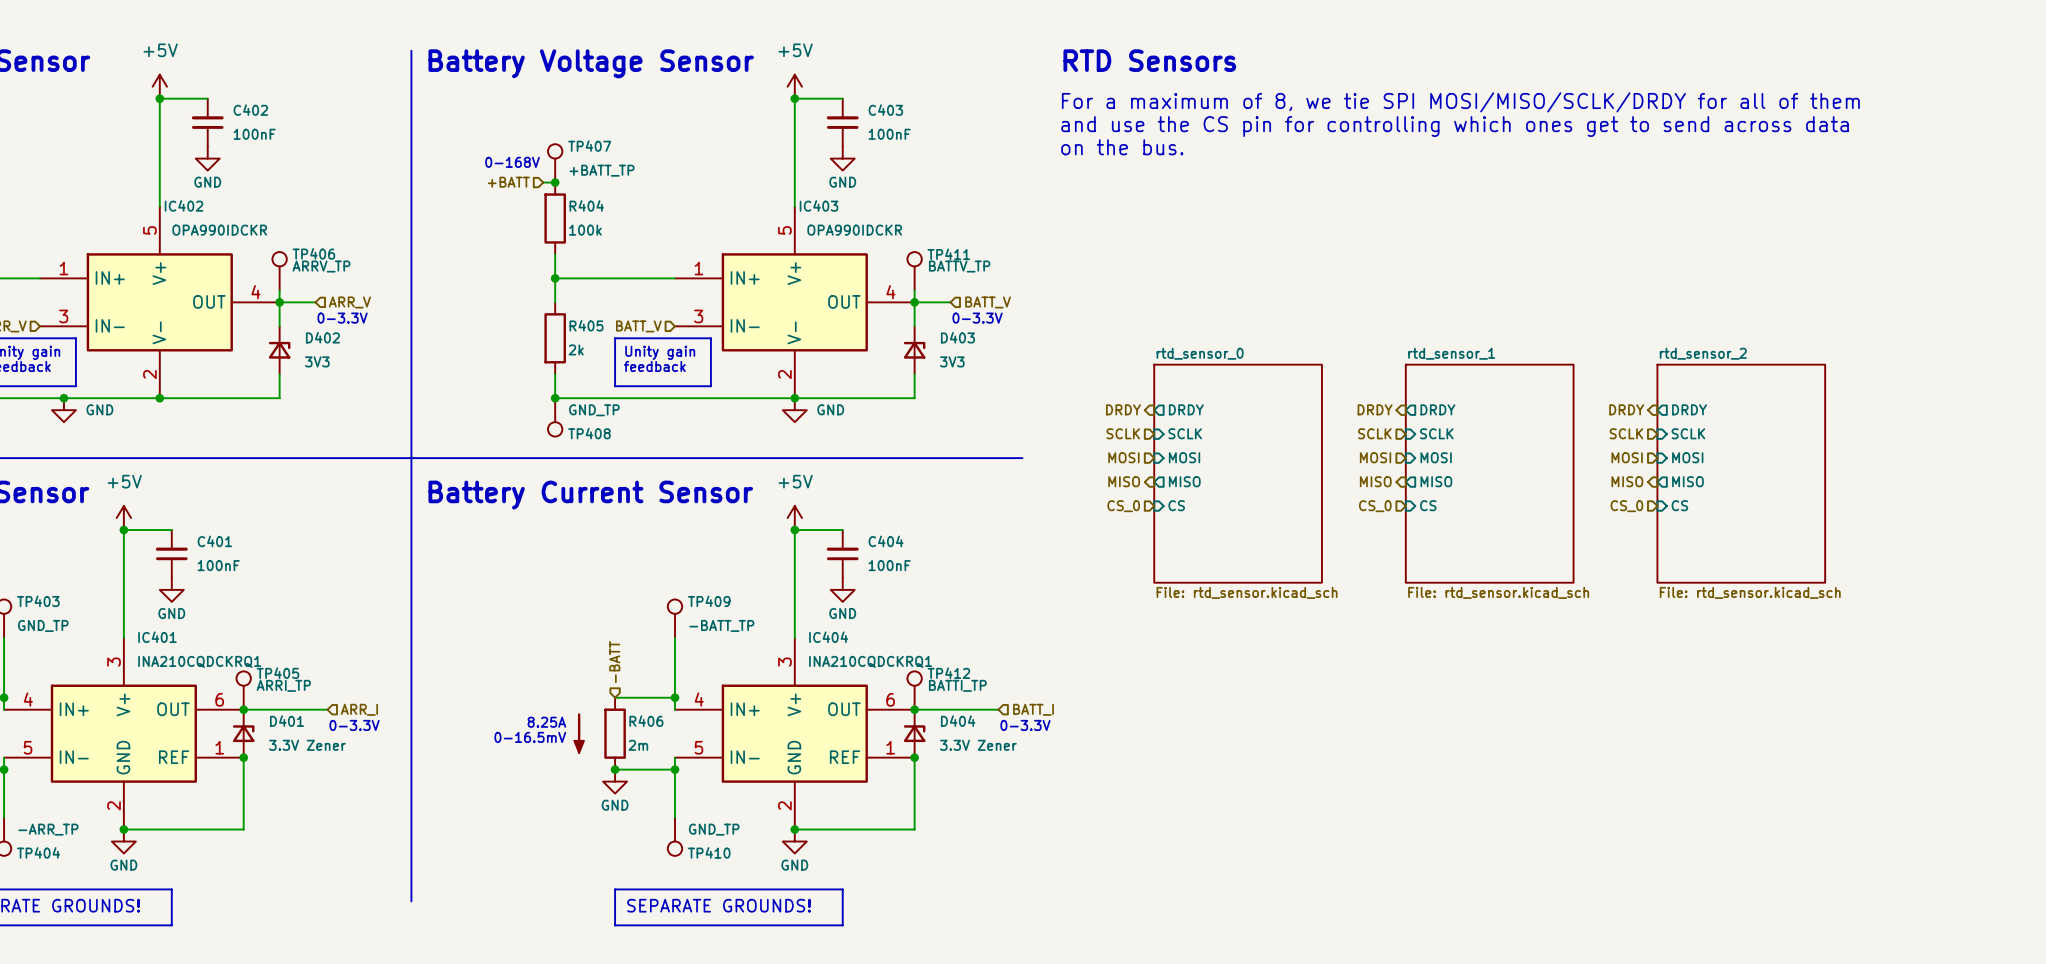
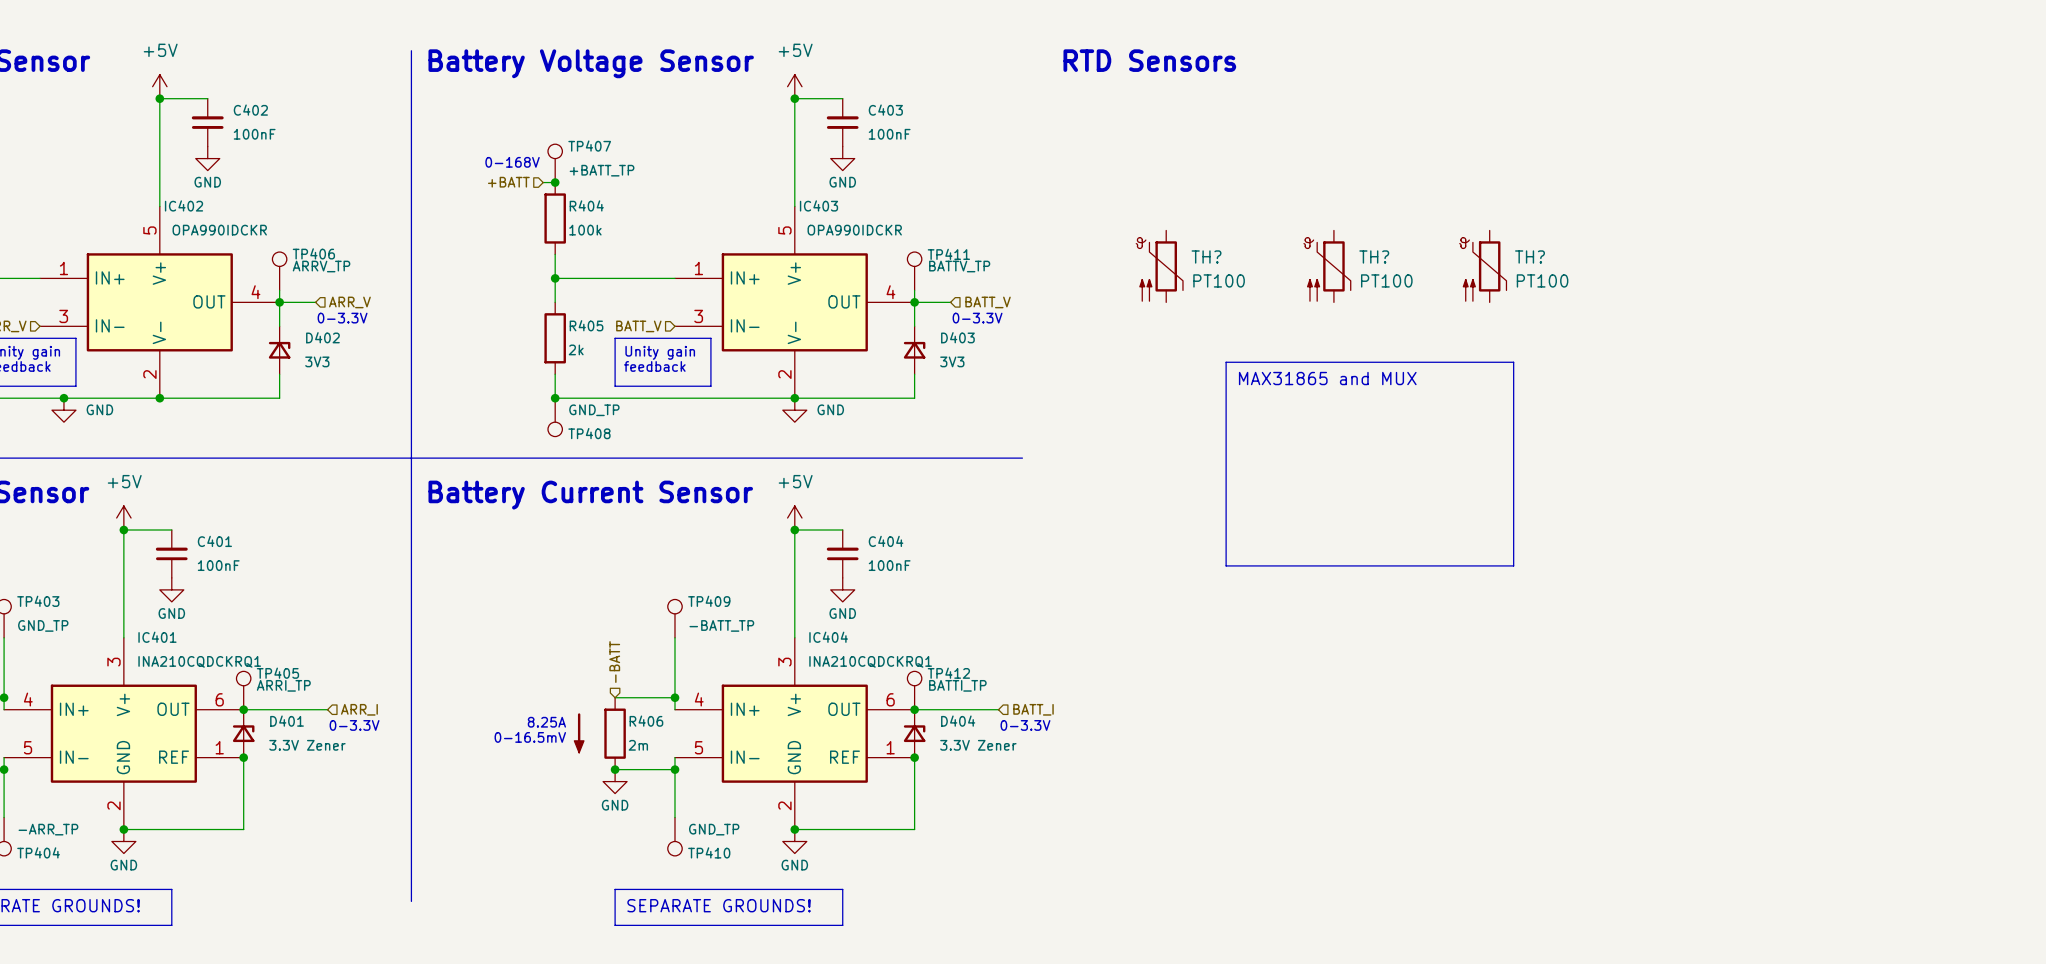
text: For a maximum of 8, we tie SPI MOSI/MISO/SCLK/DRDY for all of them (1460, 102) -> none
text: and use the CS pin for controlling which ones get to send across data (1455, 126) -> none
text: on the bus. (1122, 147) -> none
TH?: none -> PT100 (1159, 266)
TH?: none -> PT100 (1327, 266)
TH?: none -> PT100 (1483, 266)
line: none -> (1226, 362) (1513, 362) (1513, 565) (1226, 565) (1226, 362)
text: none -> MAX31865 and MUX (1327, 378)
hierarchical label: DRDY (1123, 409) -> none
sheet pin: DRDY (1186, 409) -> none
hierarchical label: DRDY (1375, 409) -> none
sheet pin: DRDY (1437, 409) -> none
hierarchical label: DRDY (1626, 409) -> none
sheet pin: DRDY (1689, 409) -> none
hierarchical label: SCLK (1123, 433) -> none
sheet pin: SCLK (1185, 433) -> none
hierarchical label: SCLK (1374, 433) -> none
sheet pin: SCLK (1436, 433) -> none
hierarchical label: SCLK (1626, 433) -> none
sheet pin: SCLK (1688, 433) -> none
hierarchical label: MOSI (1123, 457) -> none
sheet pin: MOSI (1184, 457) -> none
hierarchical label: MOSI (1375, 457) -> none
sheet pin: MOSI (1436, 457) -> none
hierarchical label: MOSI (1627, 457) -> none
sheet pin: MOSI (1687, 457) -> none
sheet rtd_sensor_0: File: rtd_sensor.kicad_sch (1238, 473) -> none
sheet rtd_sensor_1: File: rtd_sensor.kicad_sch (1489, 473) -> none
sheet rtd_sensor_2: File: rtd_sensor.kicad_sch (1741, 473) -> none
hierarchical label: MISO (1124, 481) -> none
sheet pin: MISO (1184, 481) -> none
hierarchical label: MISO (1375, 481) -> none
sheet pin: MISO (1436, 481) -> none
hierarchical label: MISO (1627, 481) -> none
sheet pin: MISO (1687, 481) -> none
sheet pin: CS (1176, 505) -> none
sheet pin: CS (1428, 505) -> none
sheet pin: CS (1679, 505) -> none
hierarchical label: CS_0 (1123, 506) -> none
hierarchical label: CS_0 (1375, 506) -> none
hierarchical label: CS_0 (1626, 506) -> none

